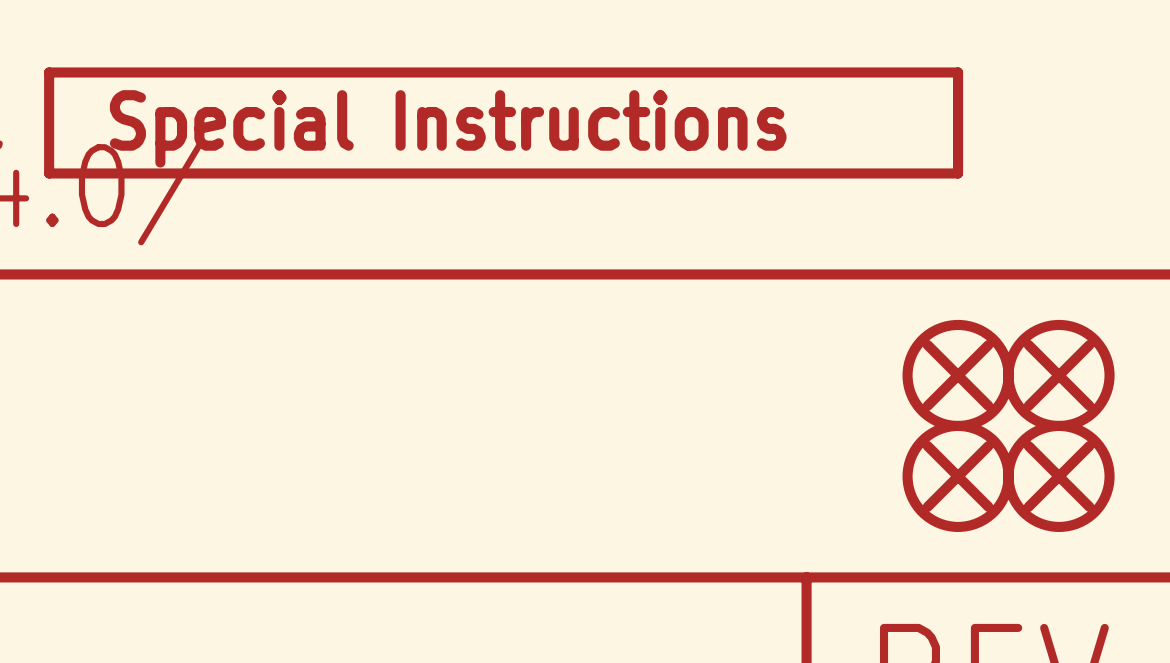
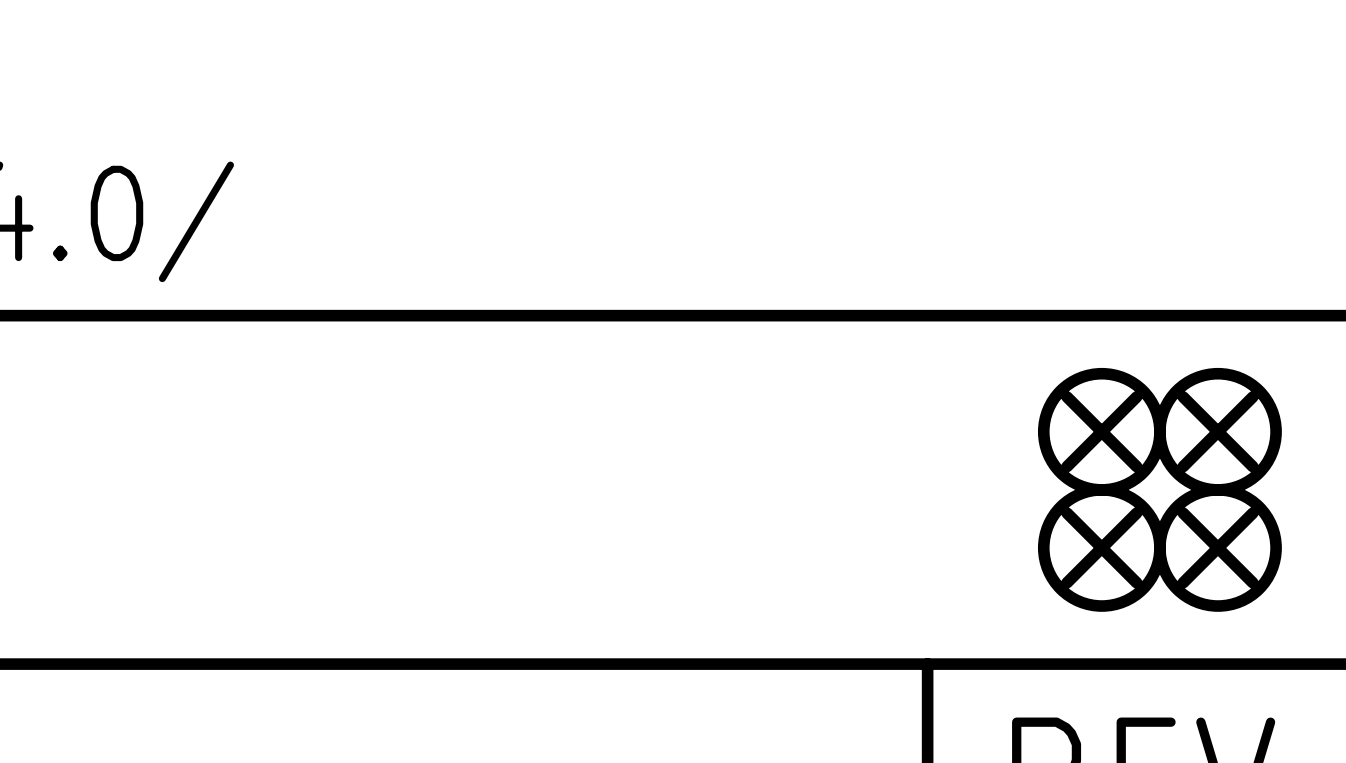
part: (503, 122) -> none

